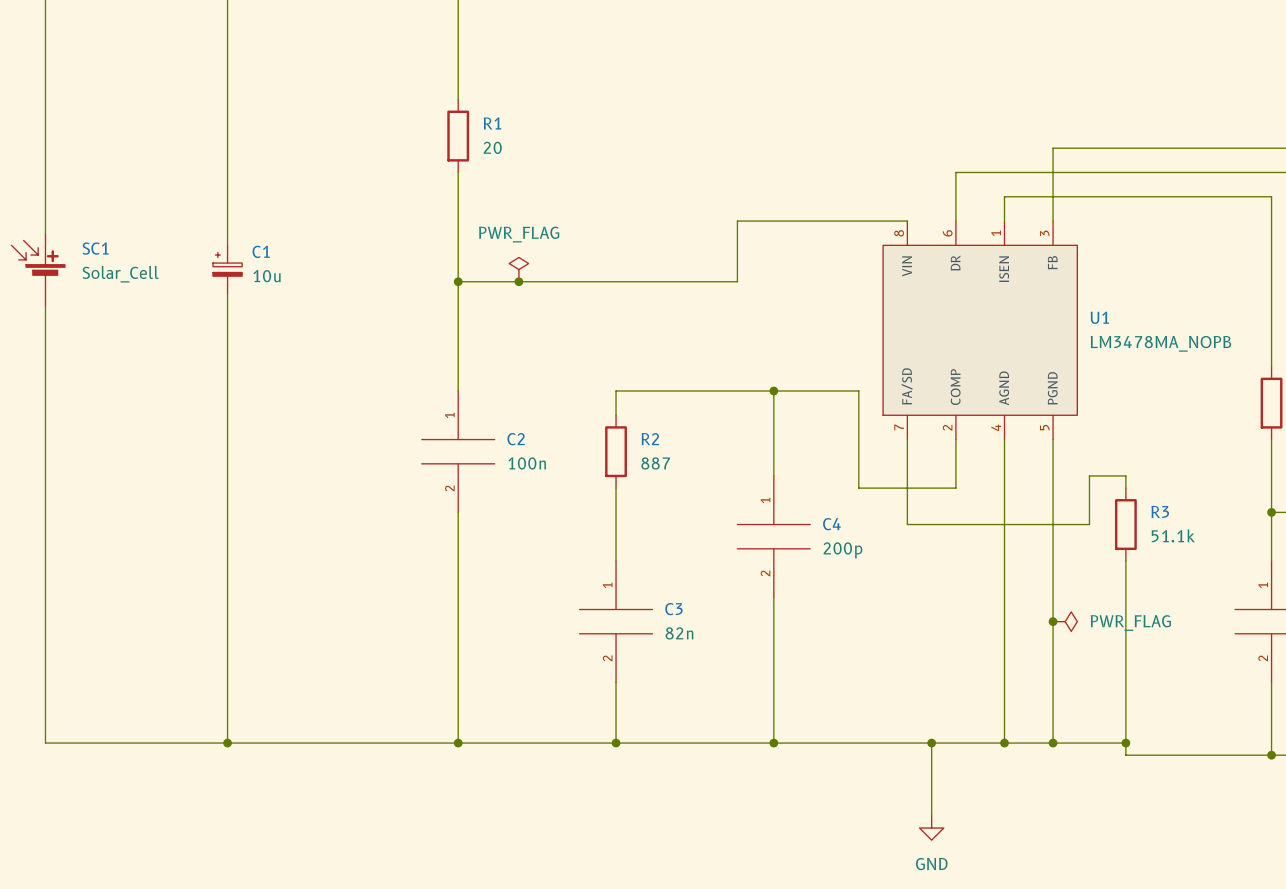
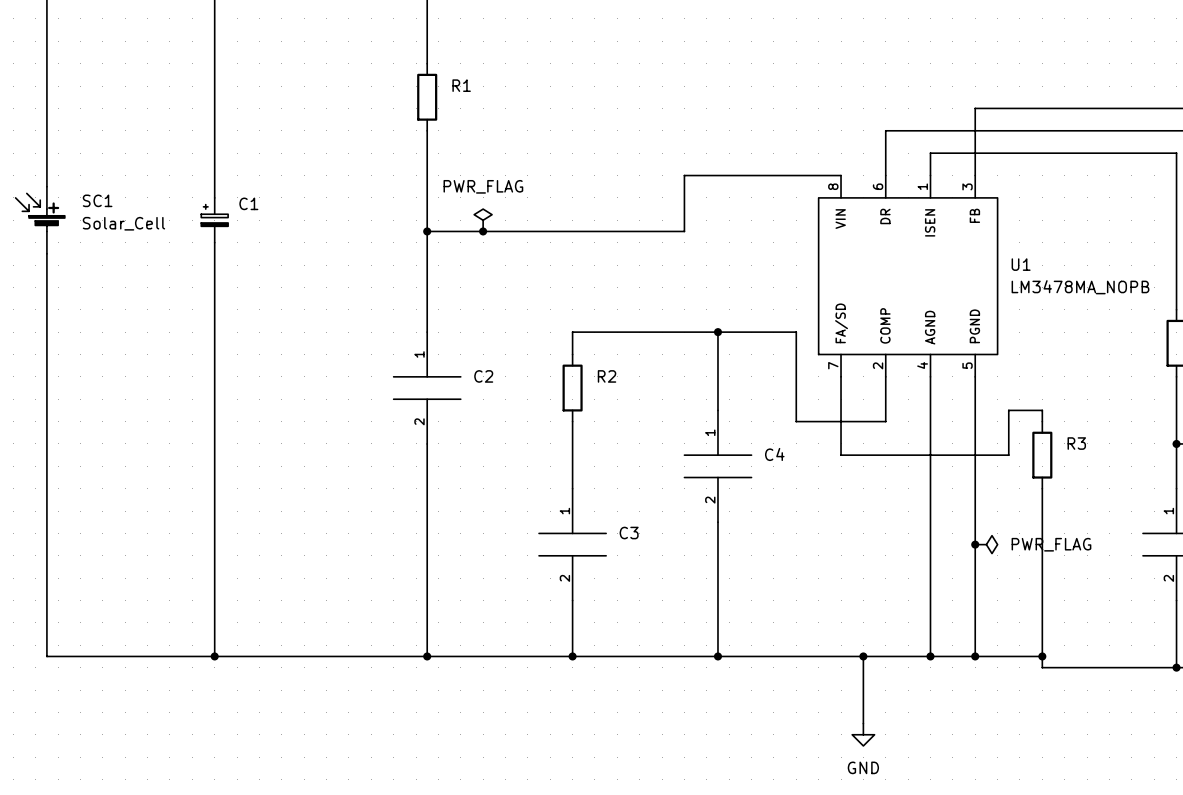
R1 value: 20 (492, 147) -> none
C1 value: 10u (267, 276) -> none
C2 value: 100n (527, 463) -> none
R2 value: 887 (655, 463) -> none
R3 value: 51.1k (1173, 535) -> none
C4 value: 200p (842, 550) -> none
C3 value: 82n (679, 633) -> none

